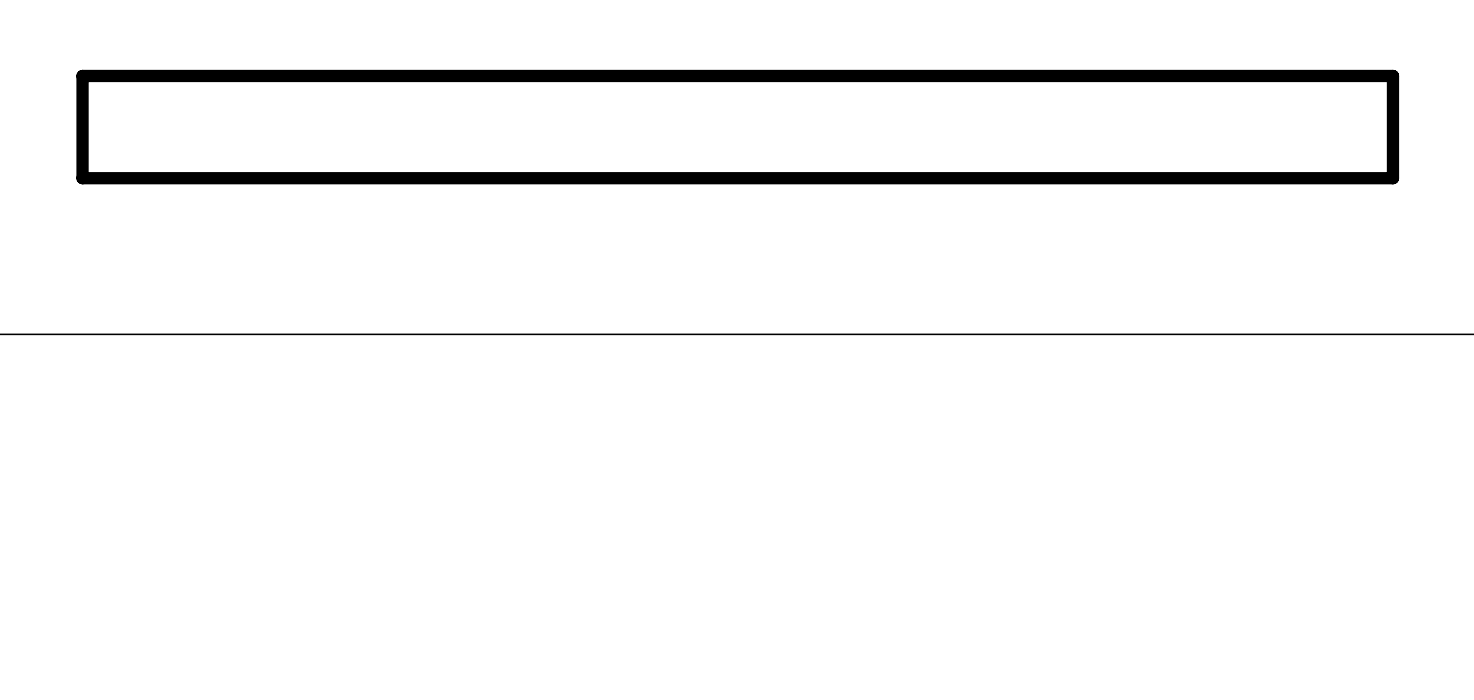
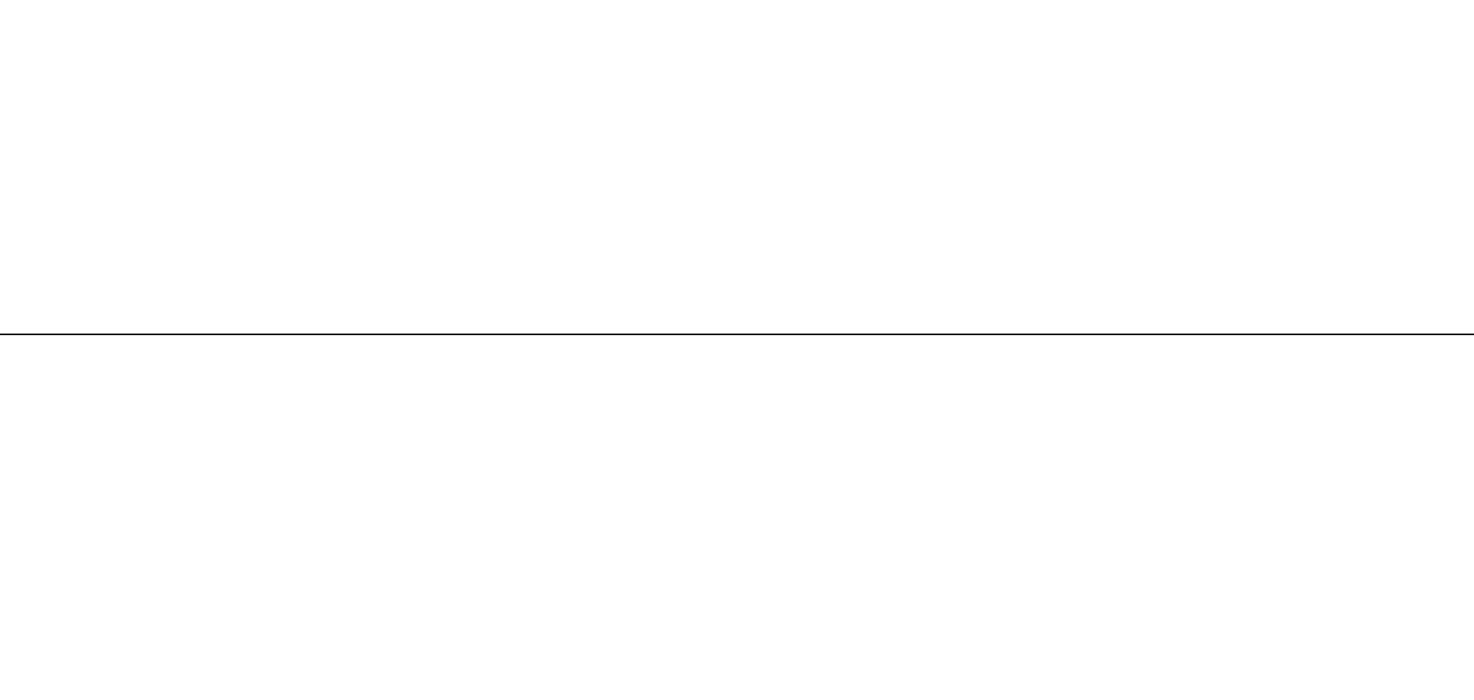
board edge: (1392, 75) (82, 75) (82, 178) (1392, 178) (1392, 75) -> none

